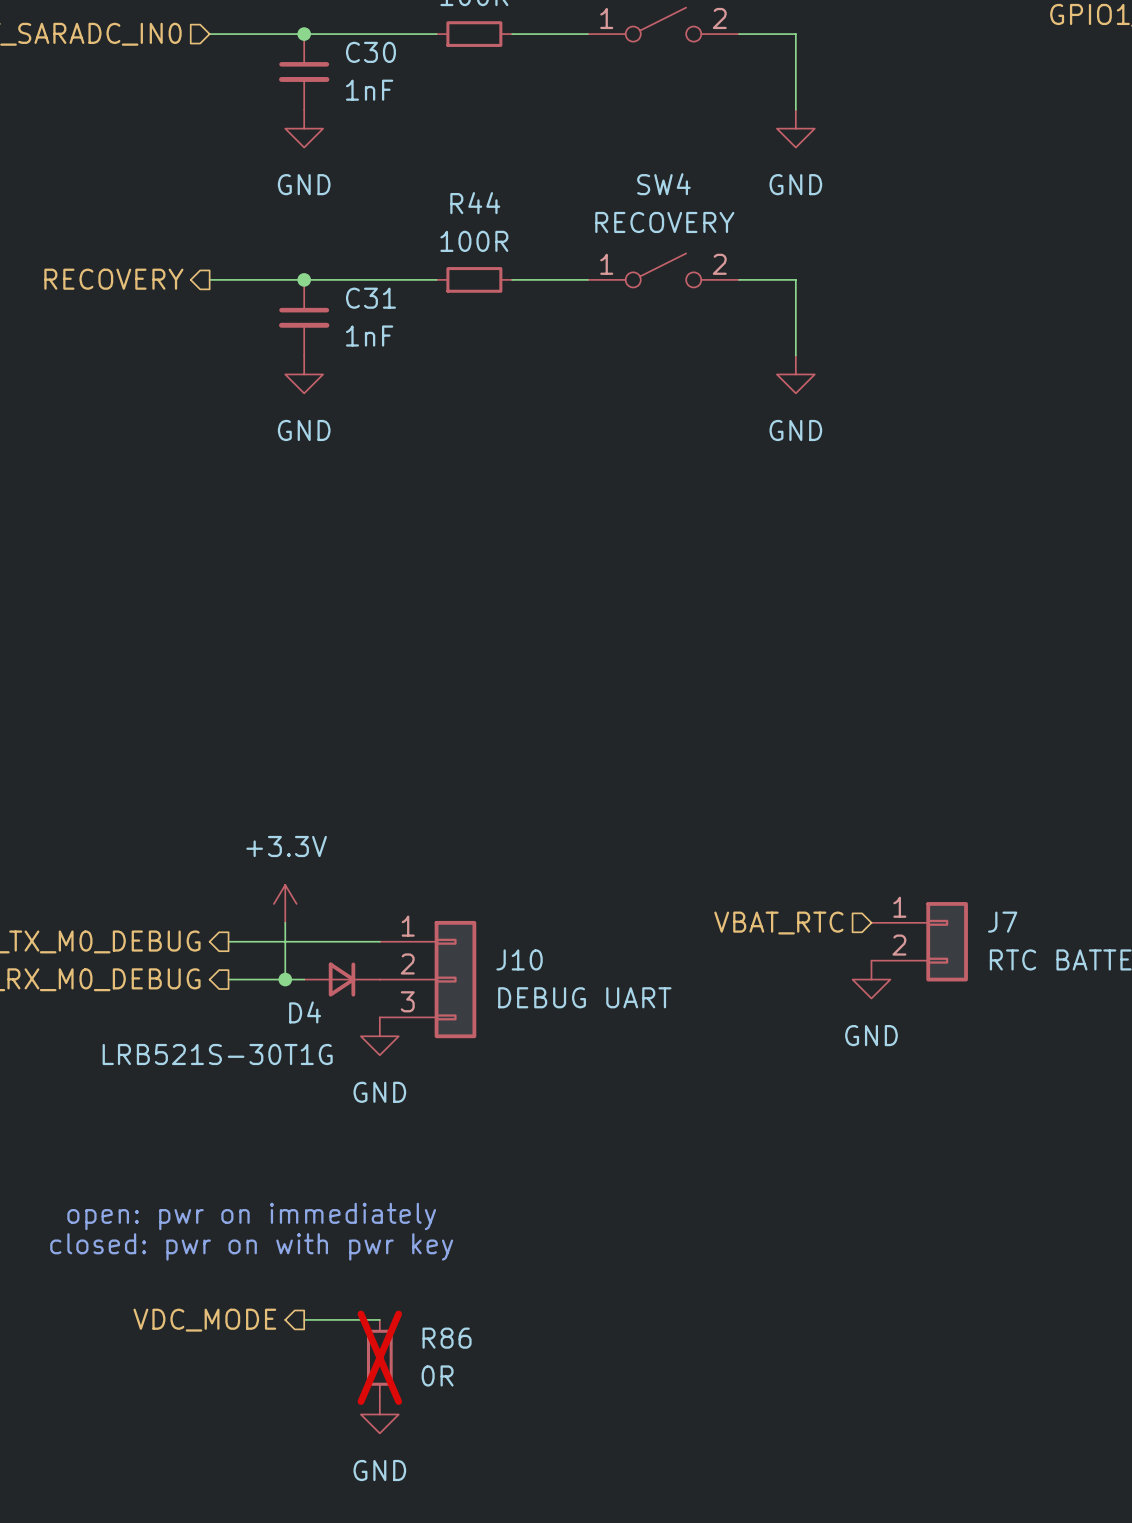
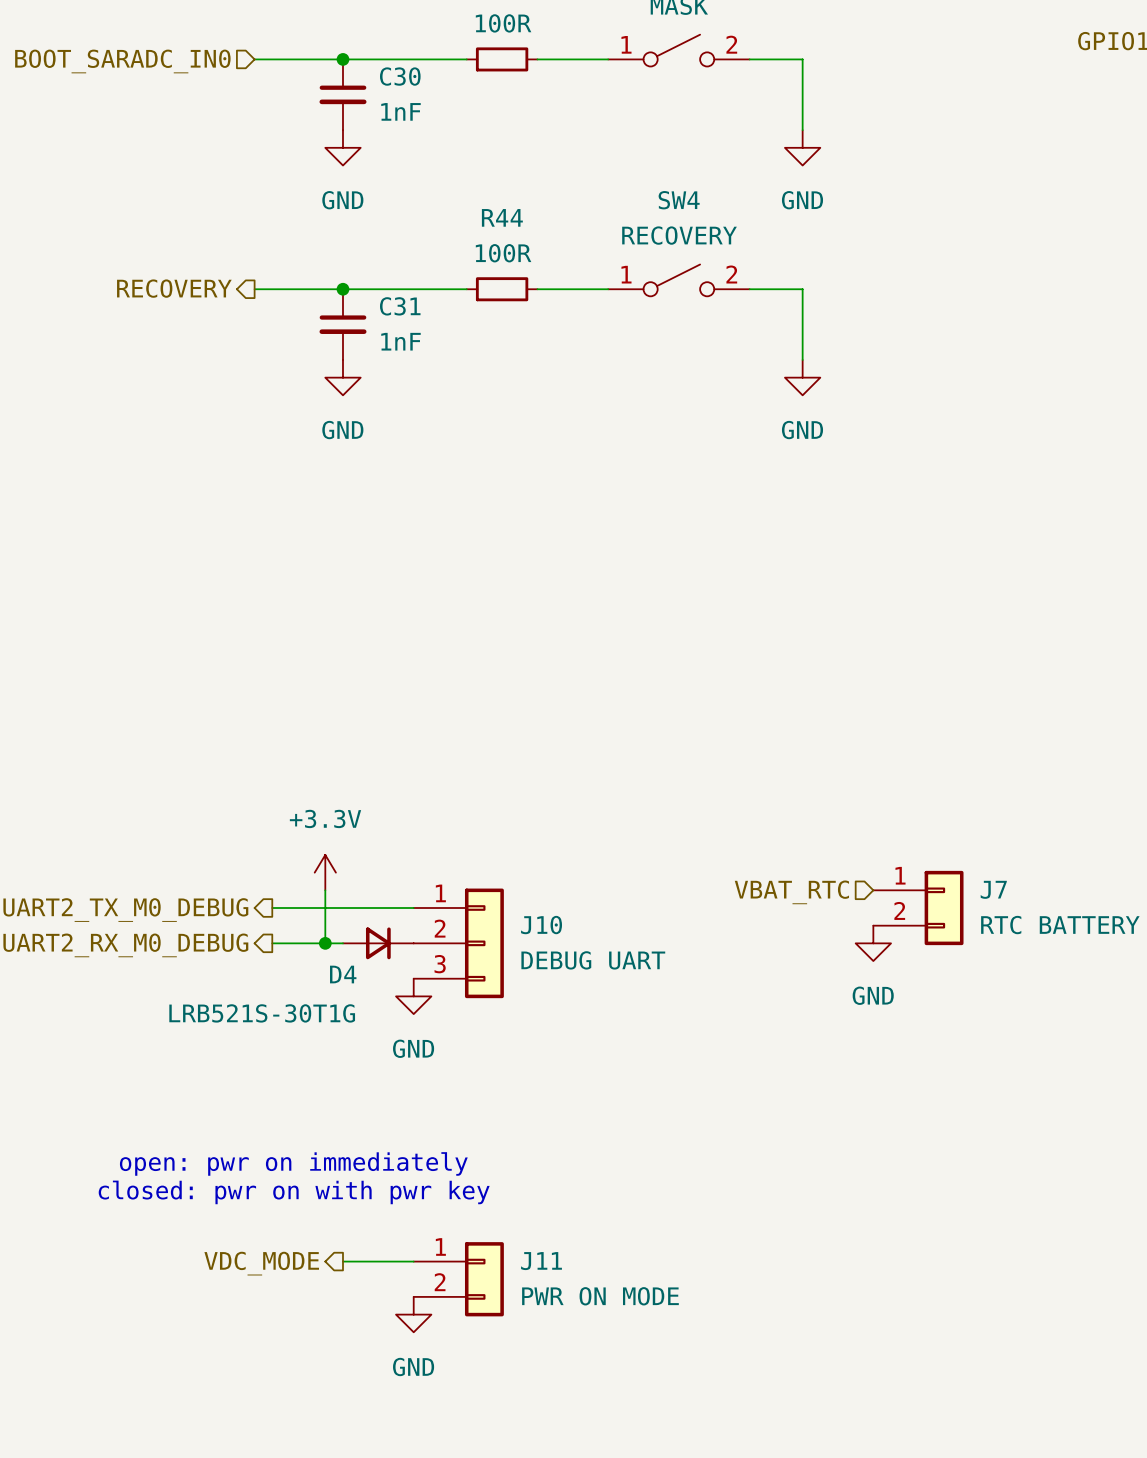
J11: none -> PWR ON MODE (458, 1279)
R86: 0R (379, 1357) -> none
power symbol position: GND (379, 1414) -> GND (413, 1314)

